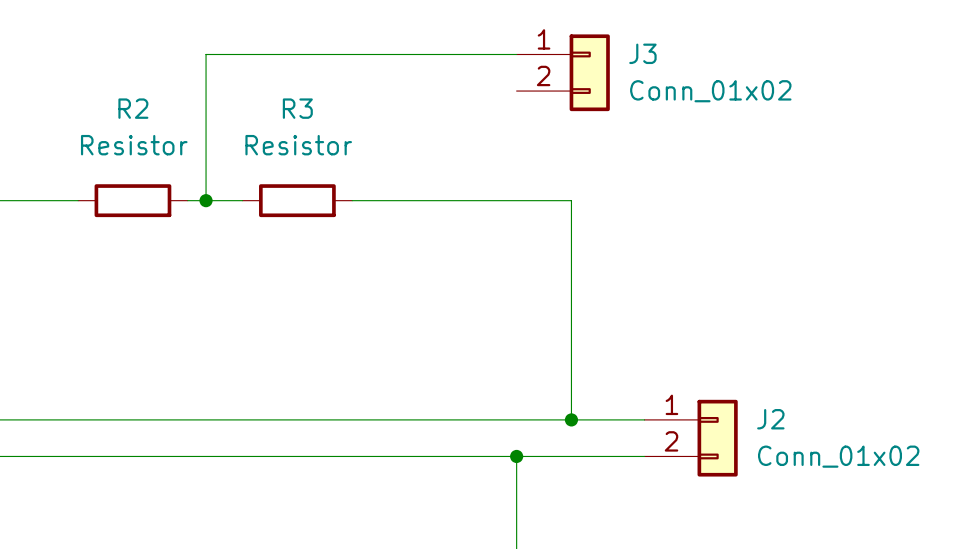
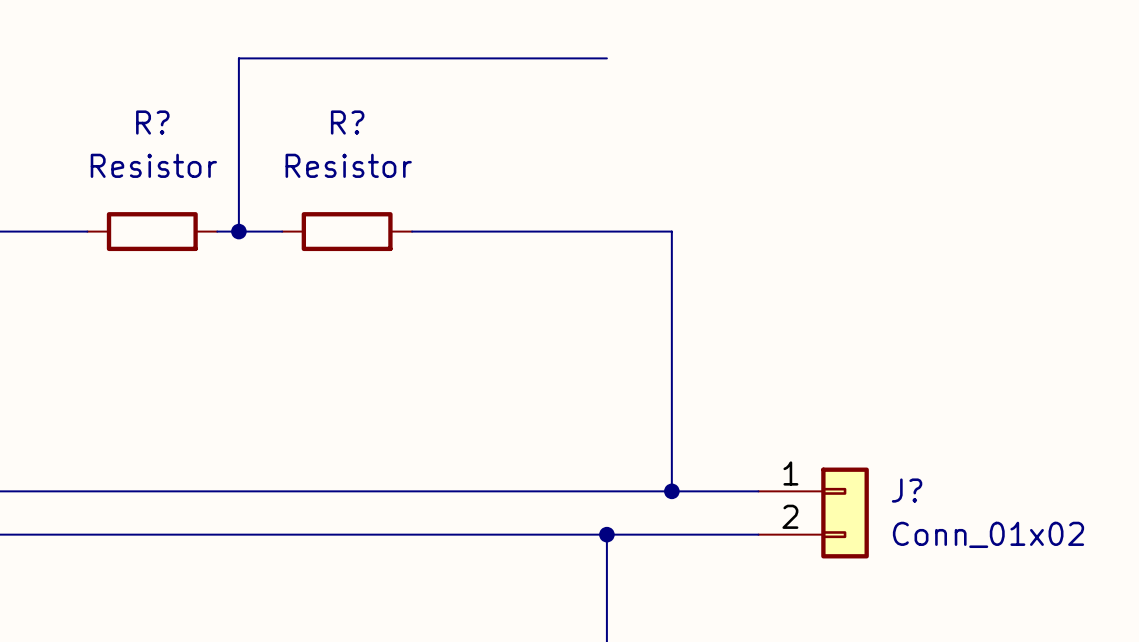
J3: Conn_01x02 (563, 72) -> none
R2 name: R2 (133, 108) -> R? (152, 122)
R3 name: R3 (297, 108) -> R? (347, 122)
J2 name: J2 (770, 419) -> J? (907, 490)

